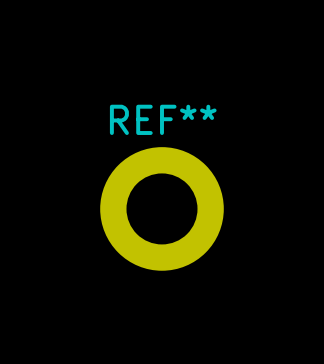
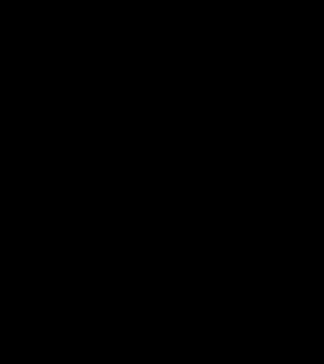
REF**: (161, 208) -> none

